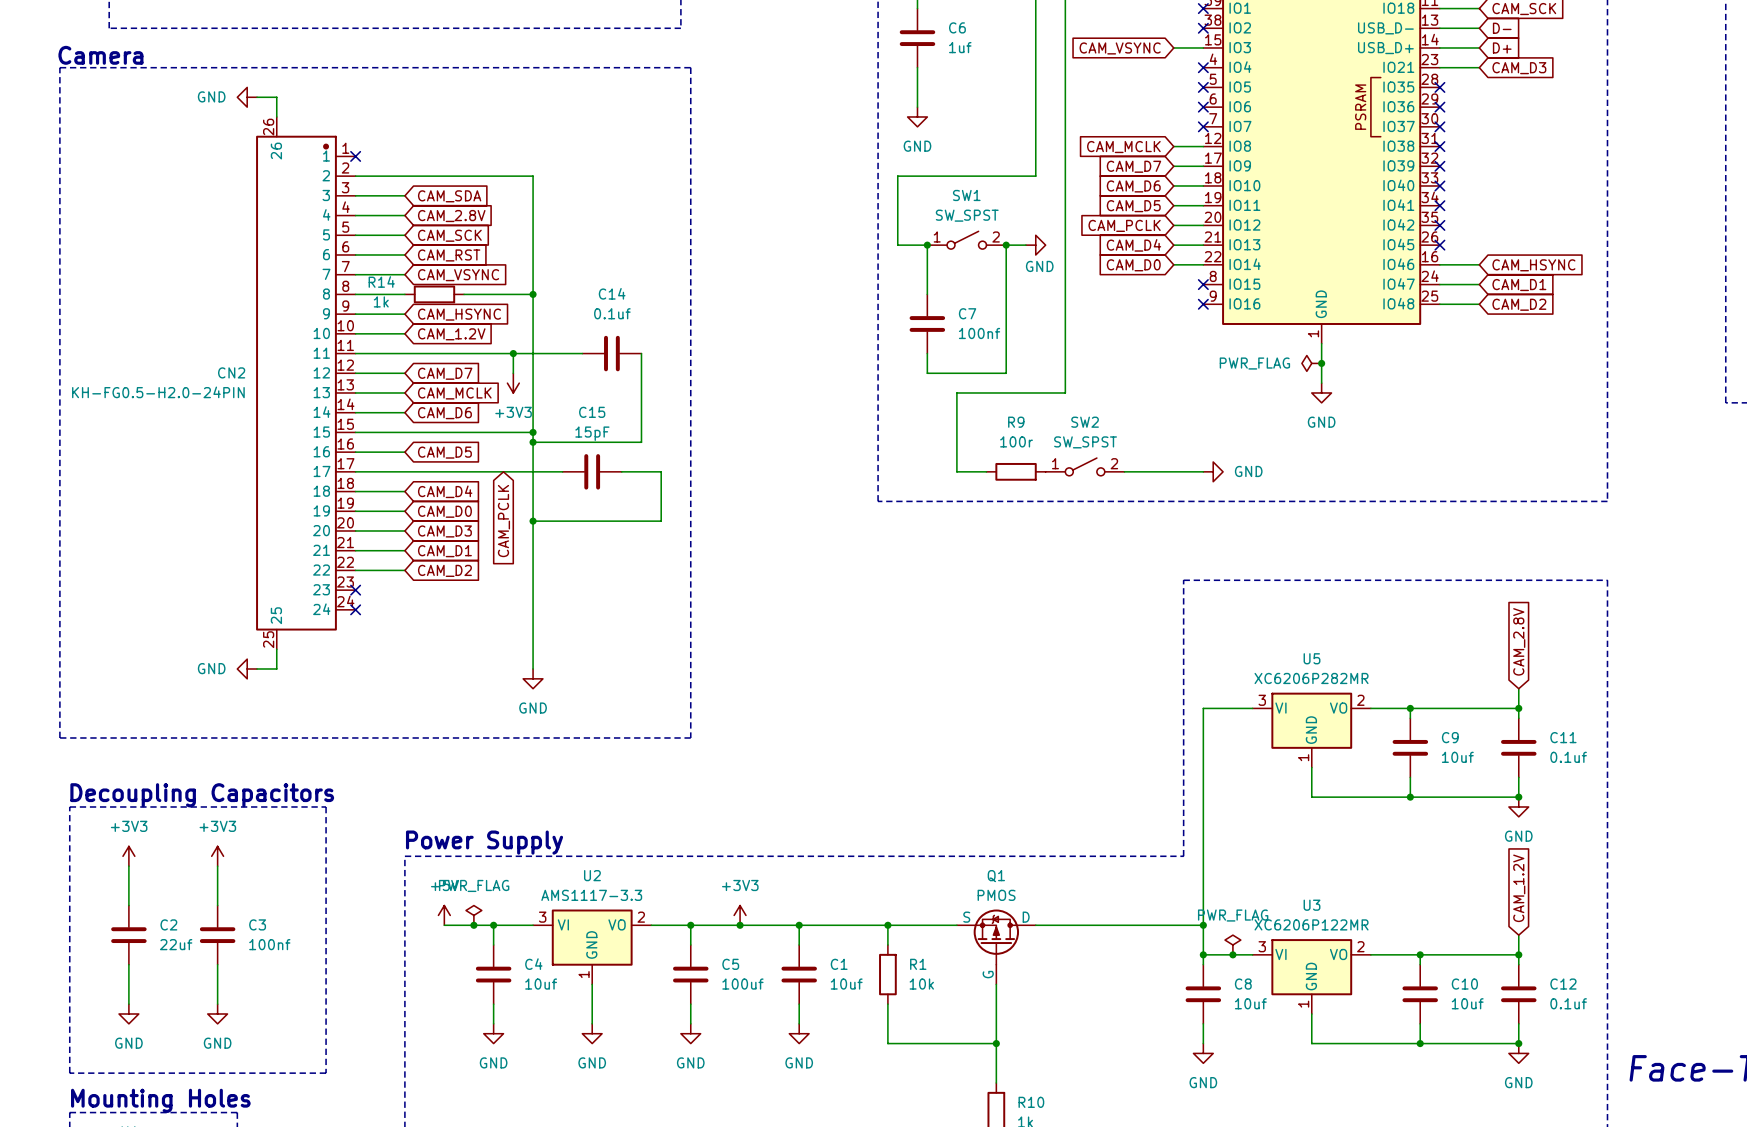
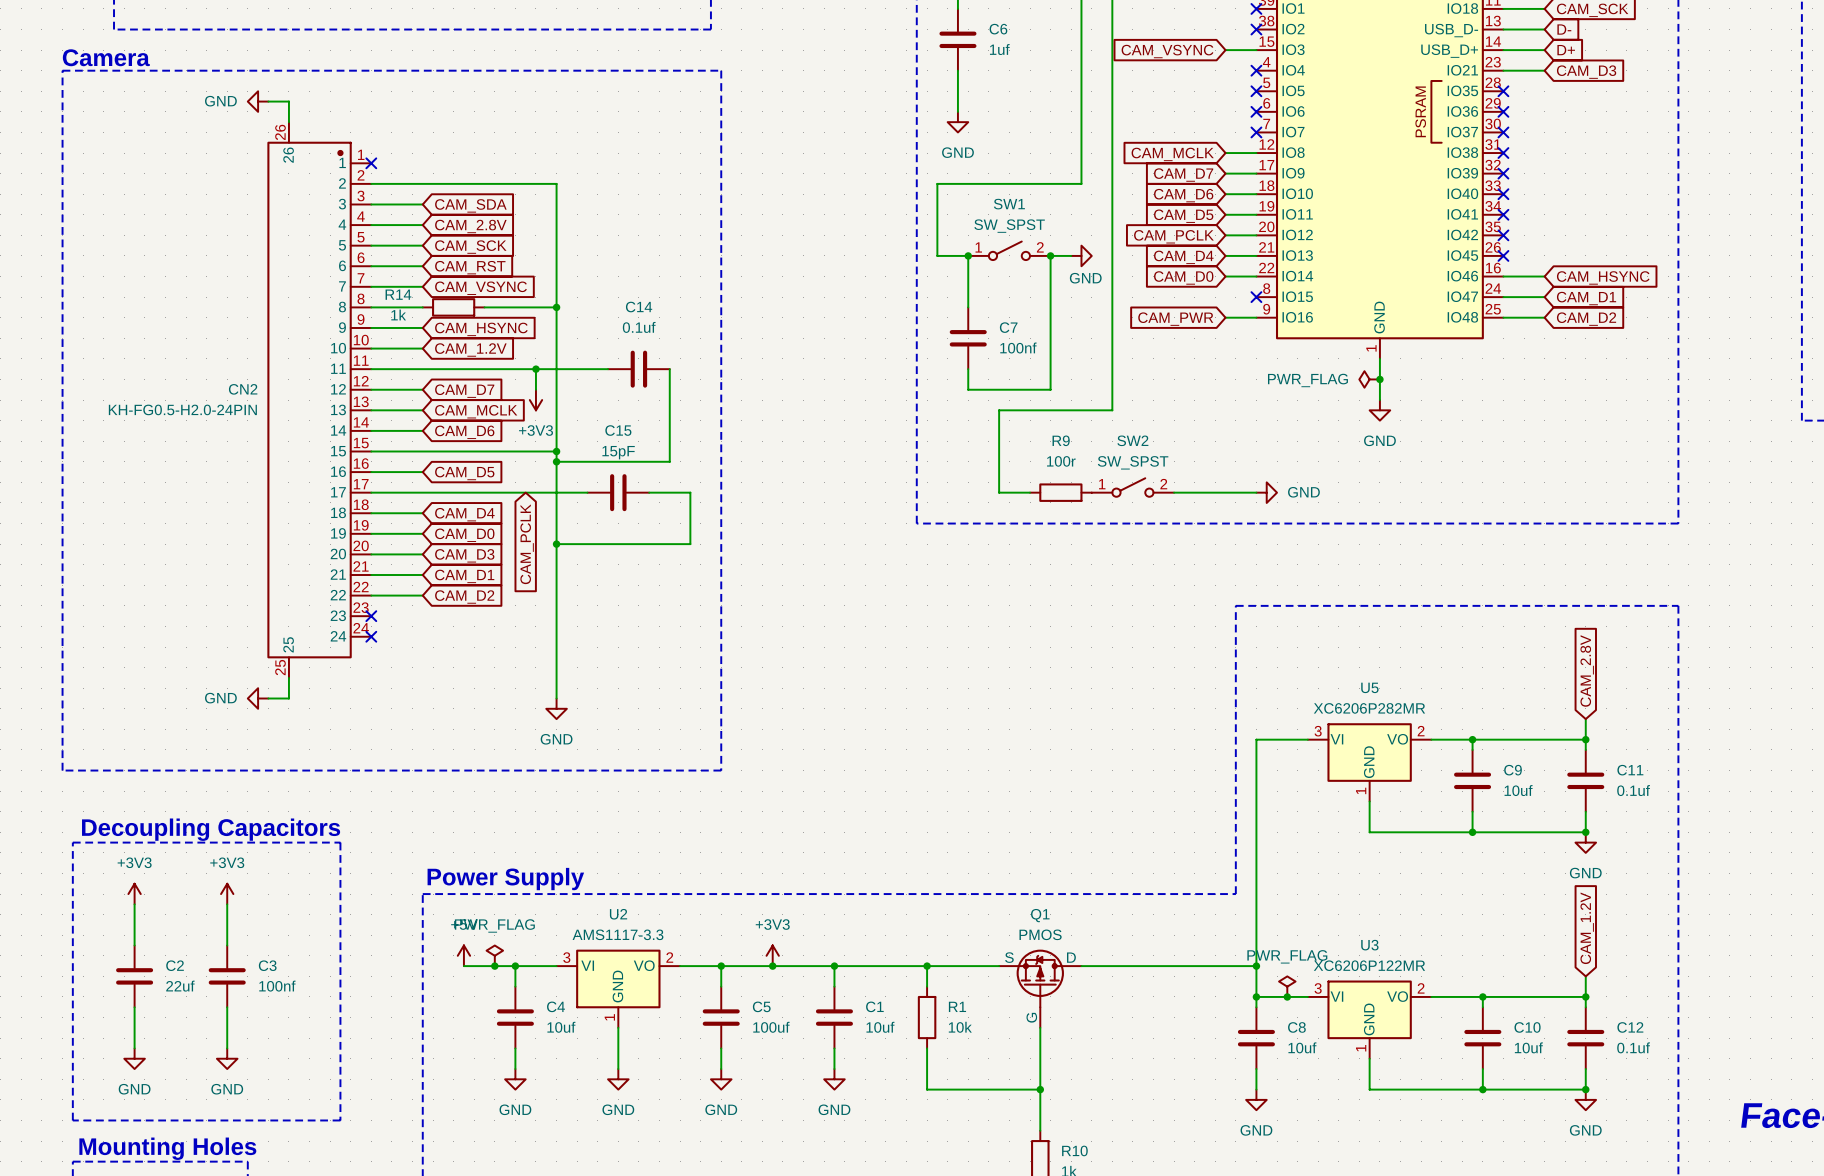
global label: none -> CAM_PWR (1175, 319)
wire: none -> (1225, 317) (1256, 317)
no-connect mark: (1203, 304) -> none

